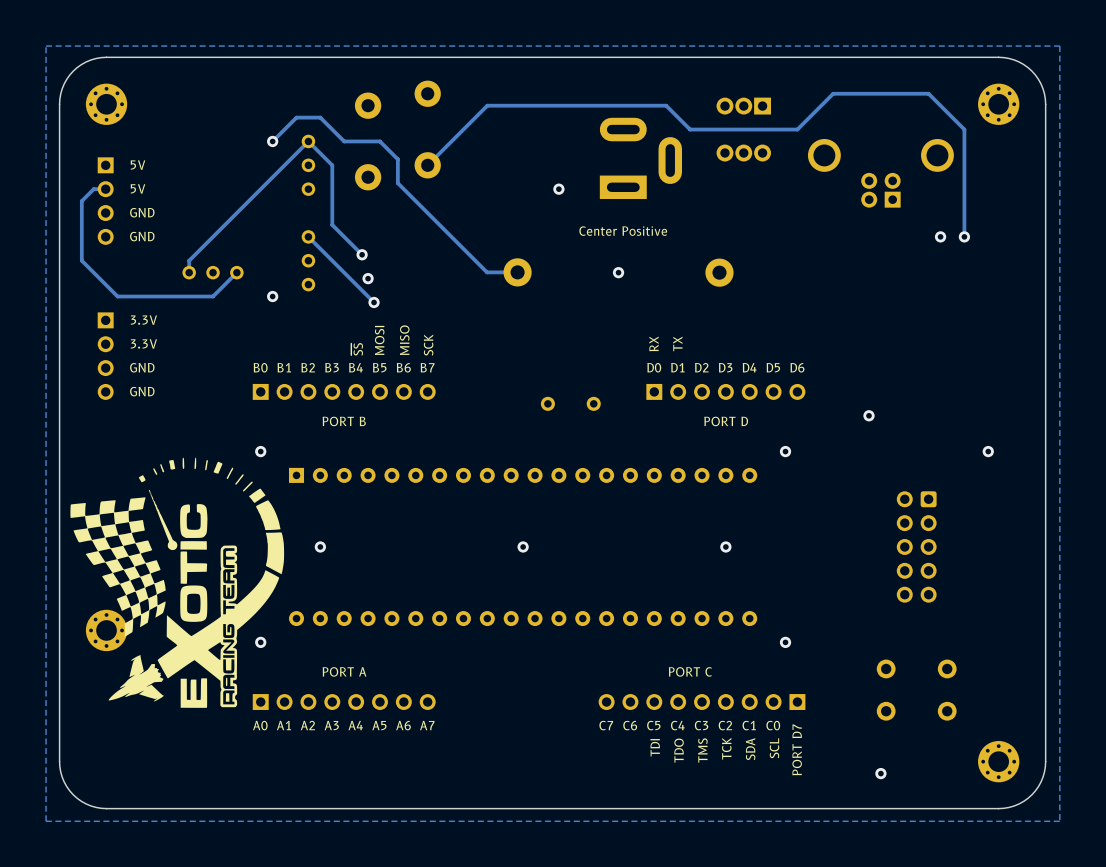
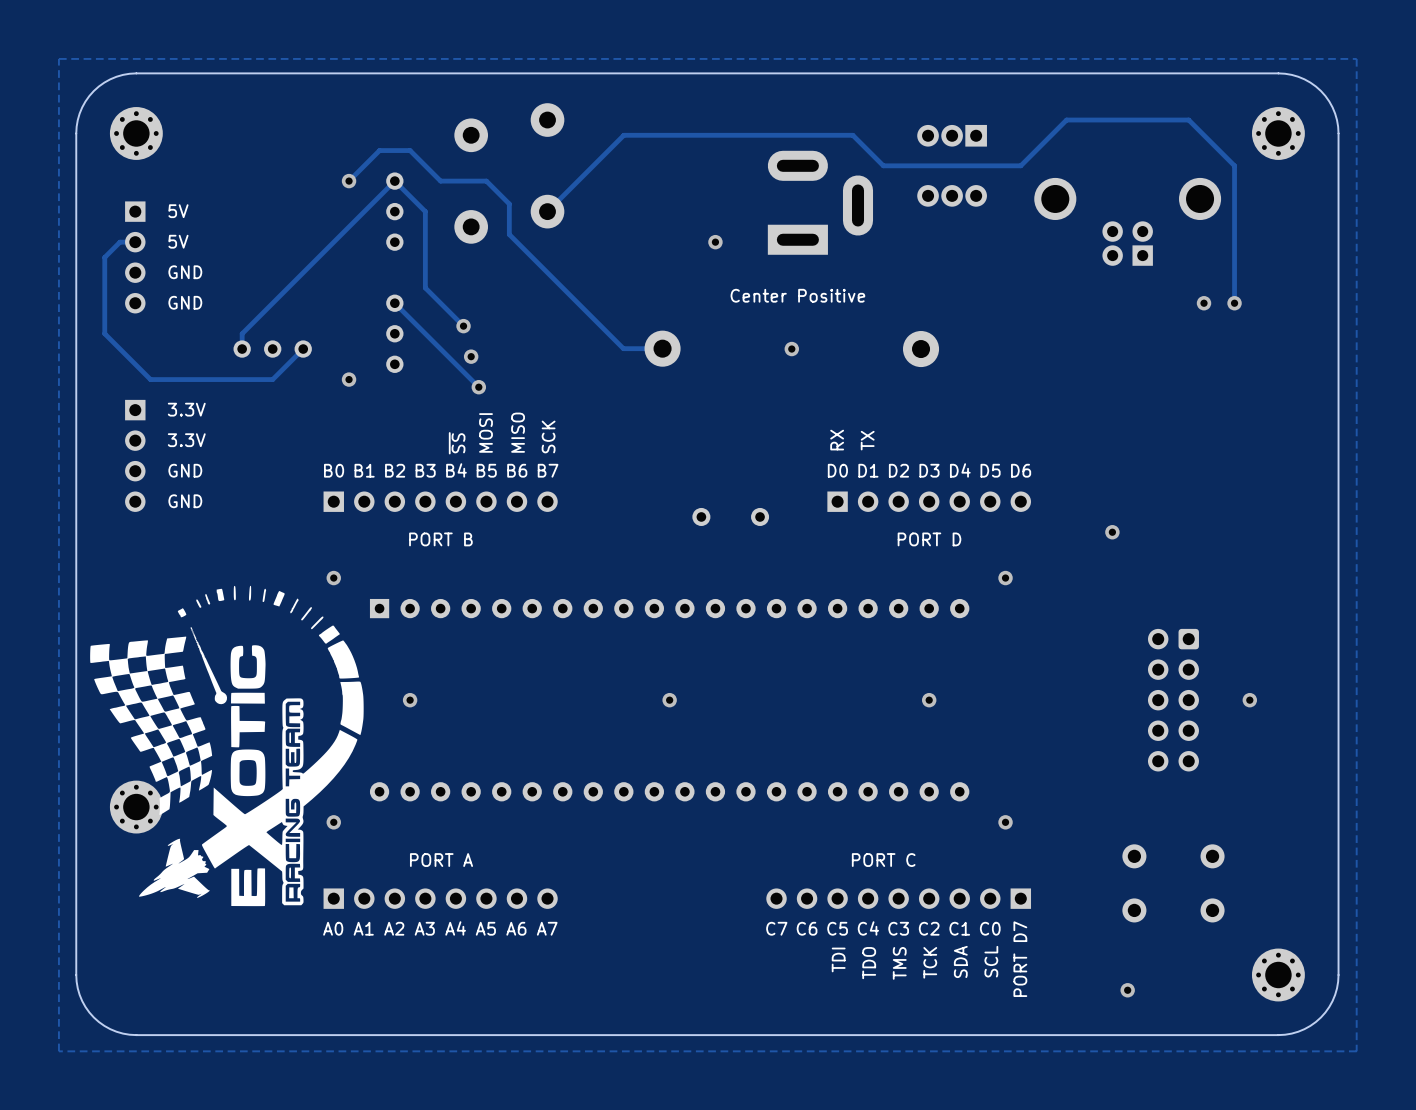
via: (988, 451) -> none
via: none -> (1249, 700)

